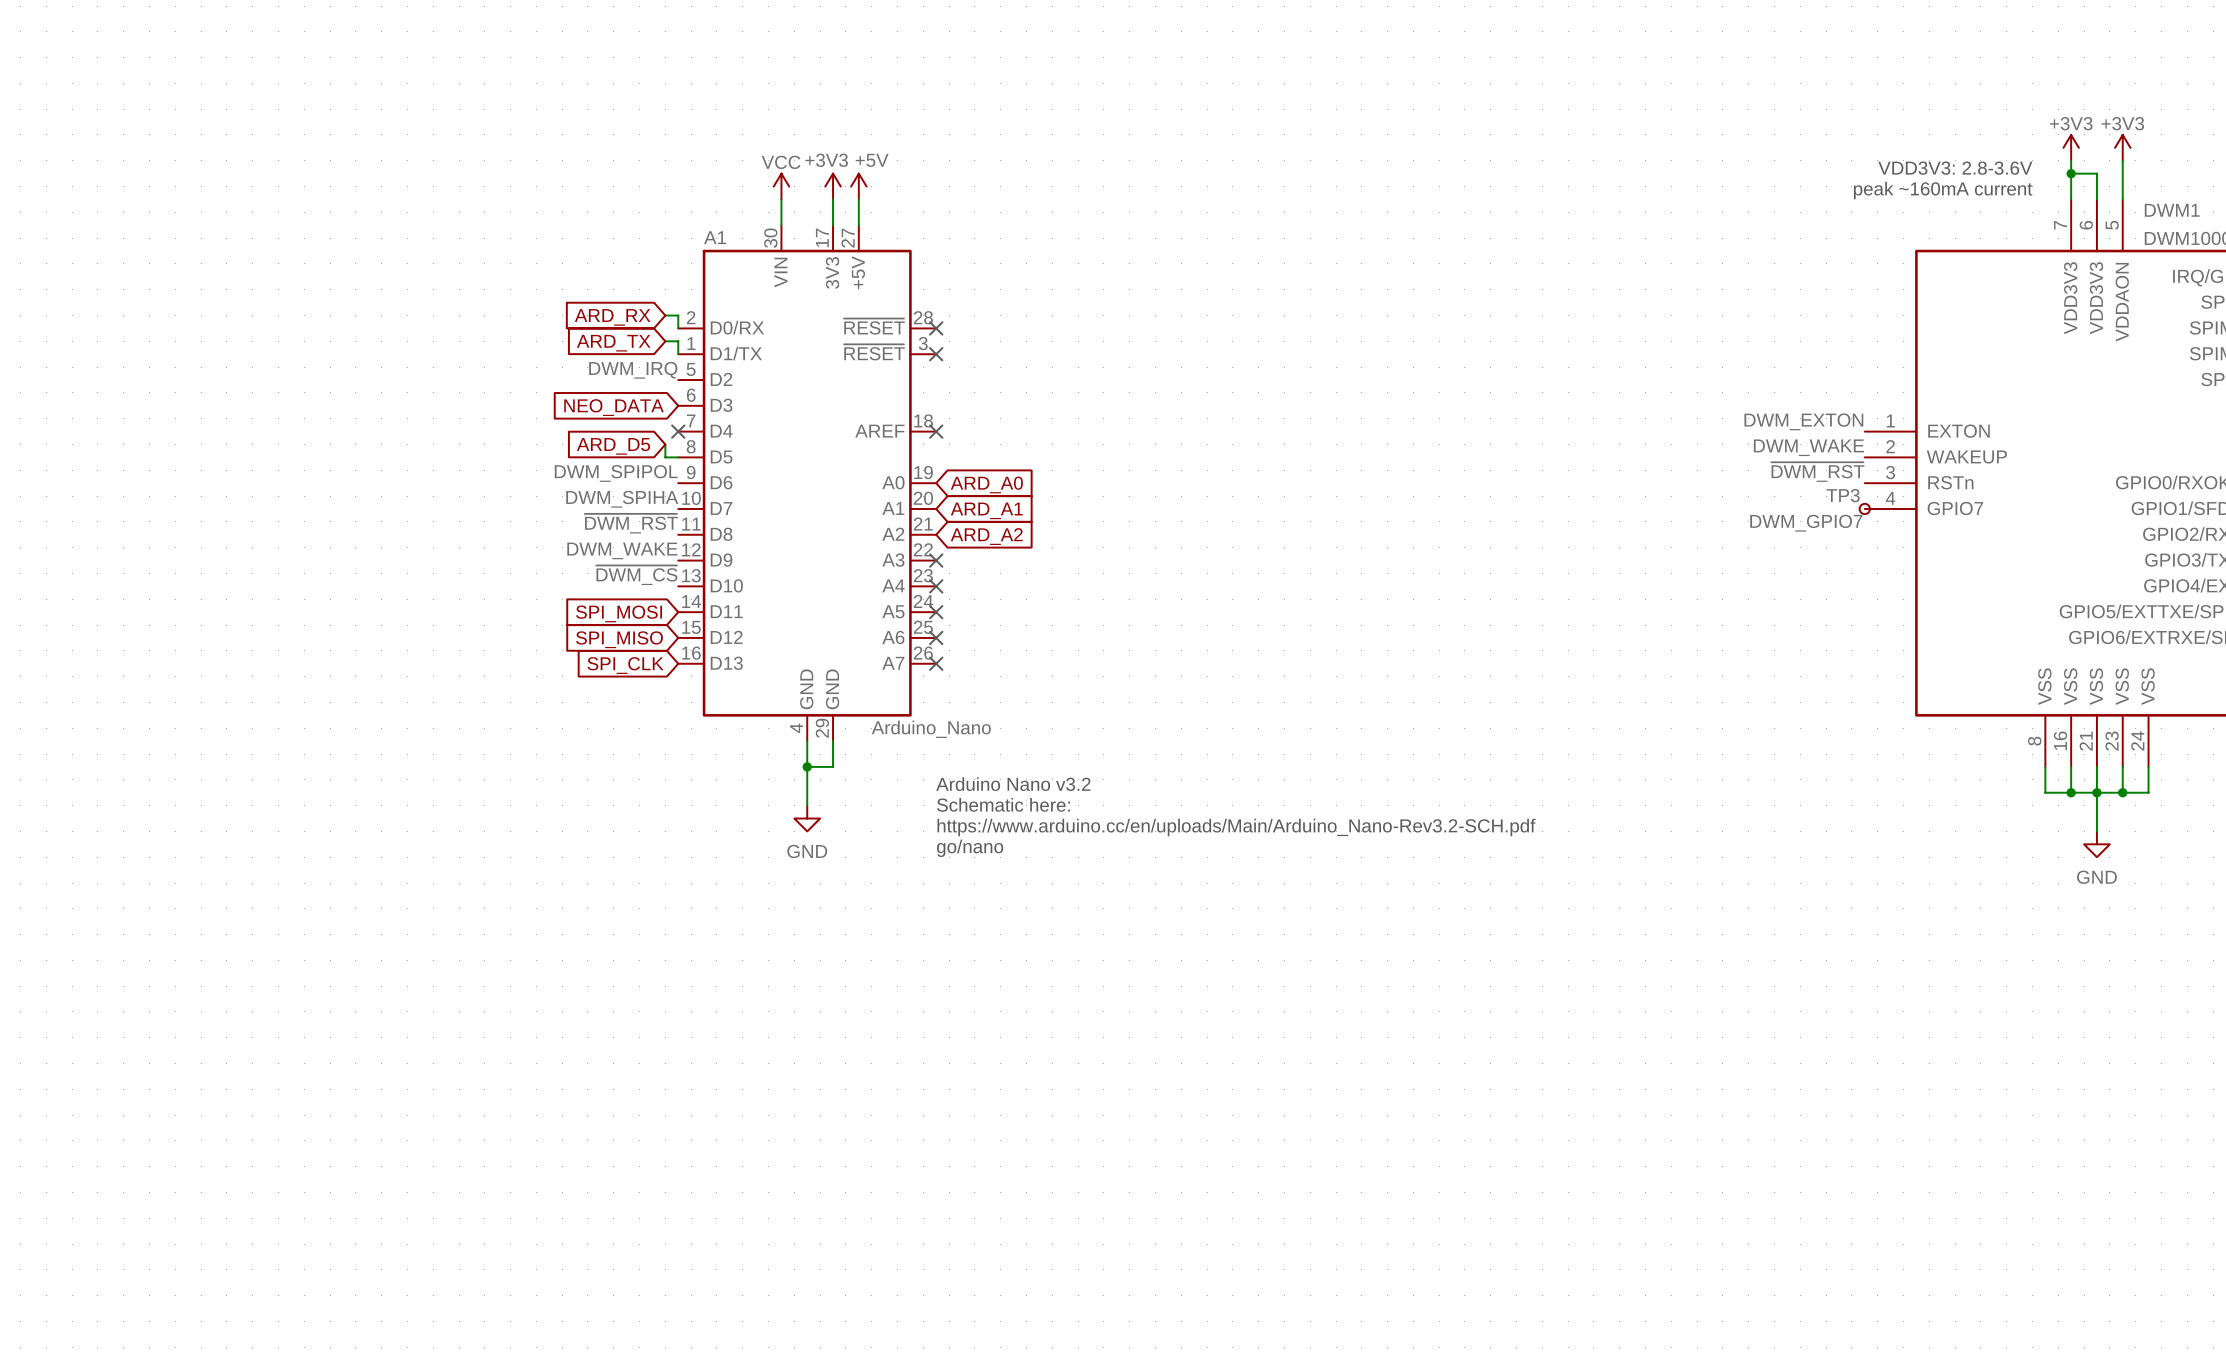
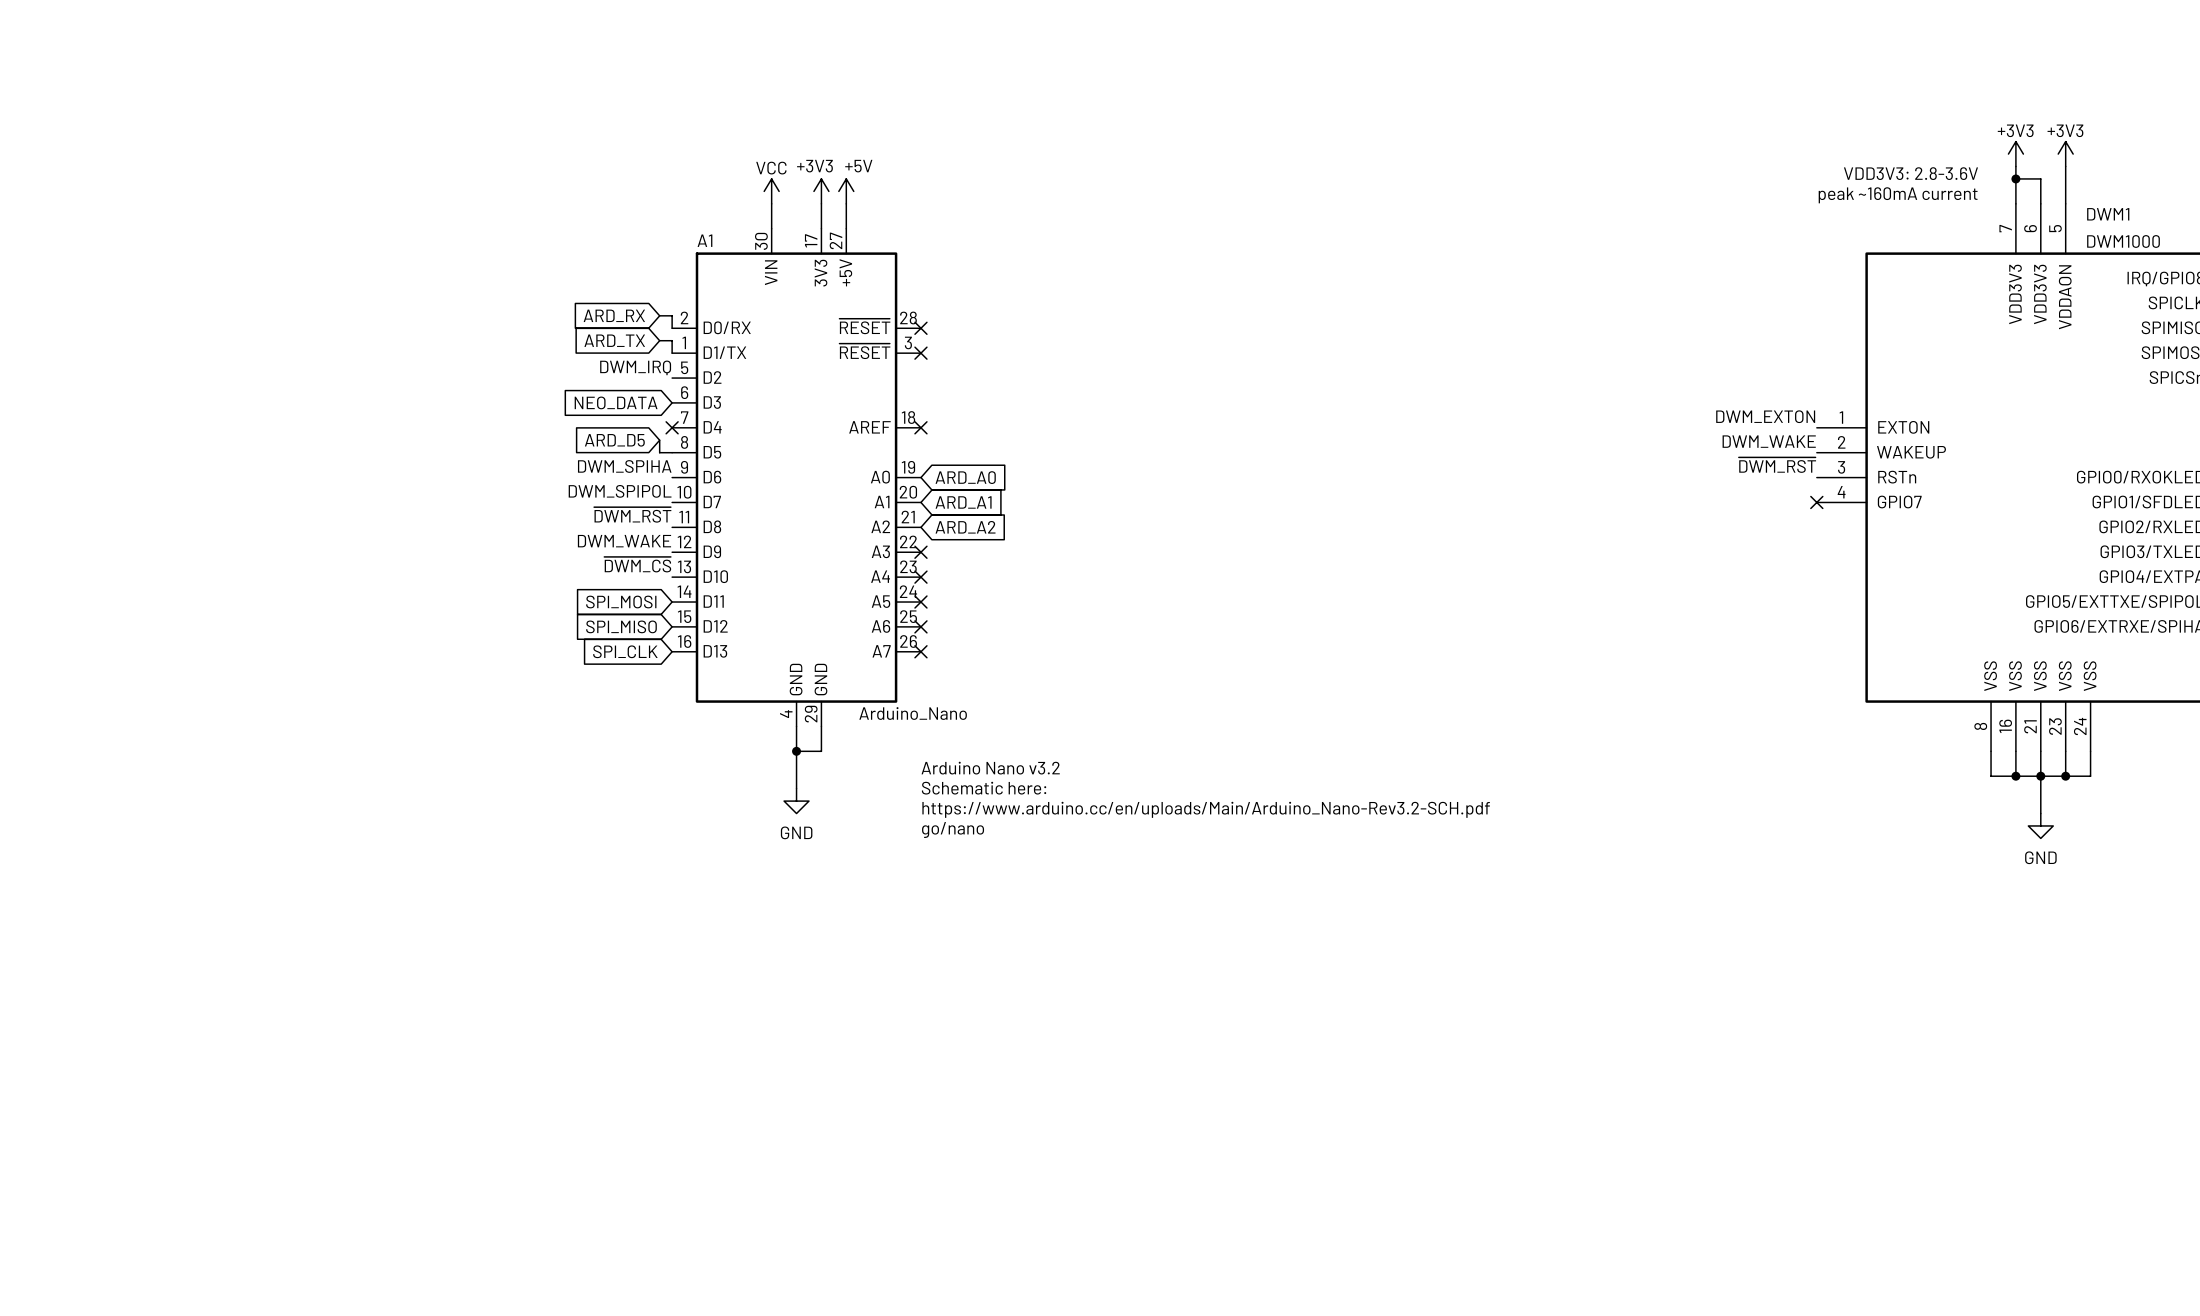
label: DWM_SPIPOL (616, 473) -> DWM_SPIHA (624, 466)
label: DWM_SPIHA (622, 499) -> DWM_SPIPOL (620, 491)
TP3: DWM_GPIO7 (1864, 508) -> none
no-connect mark: none -> (1816, 502)

